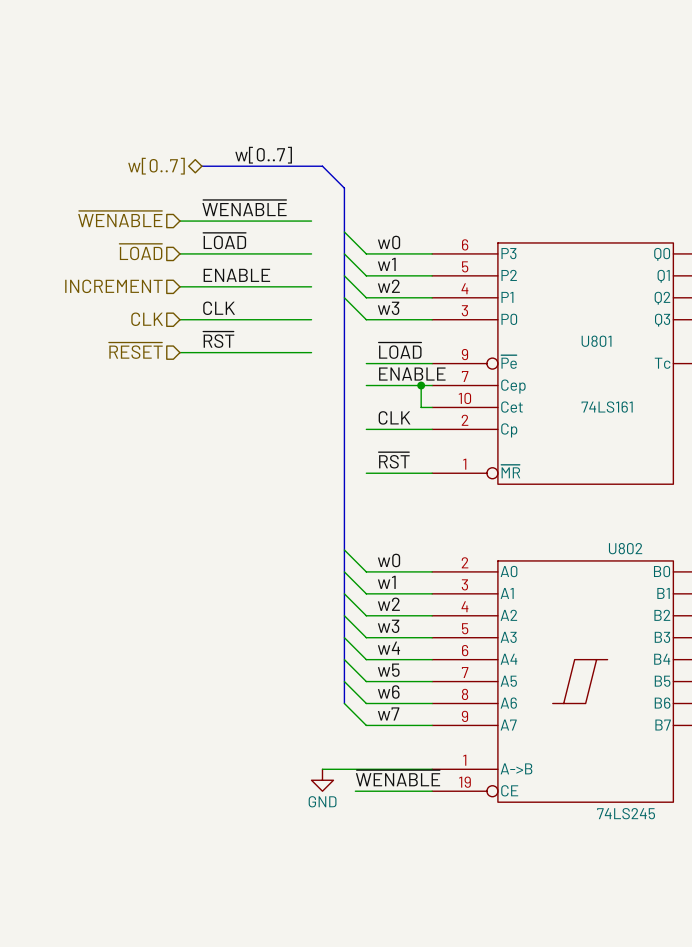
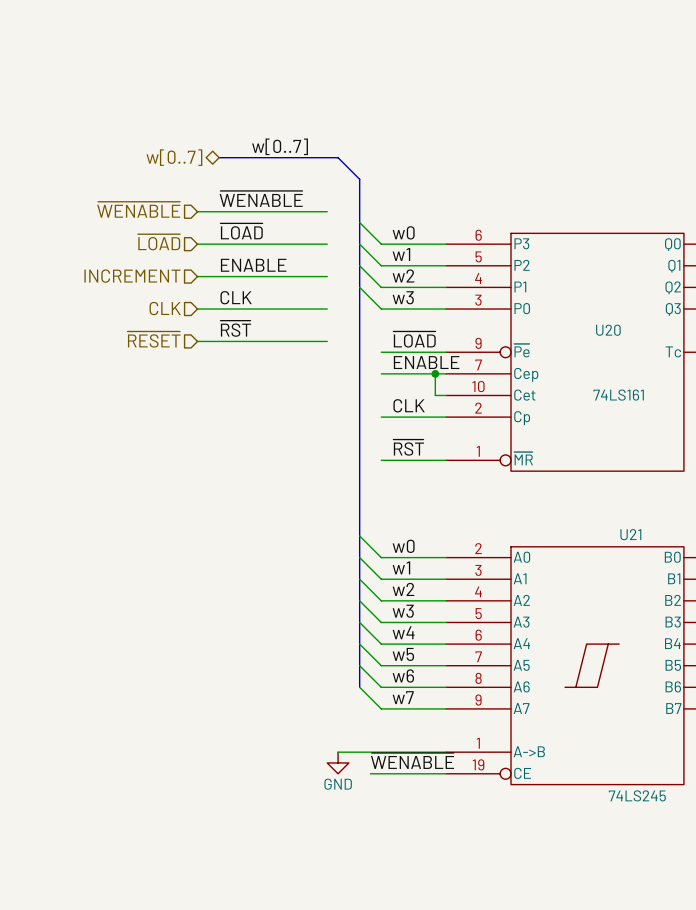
U801 name: U801 (596, 341) -> U20 (608, 330)
U802 name: U802 (625, 548) -> U21 (630, 534)

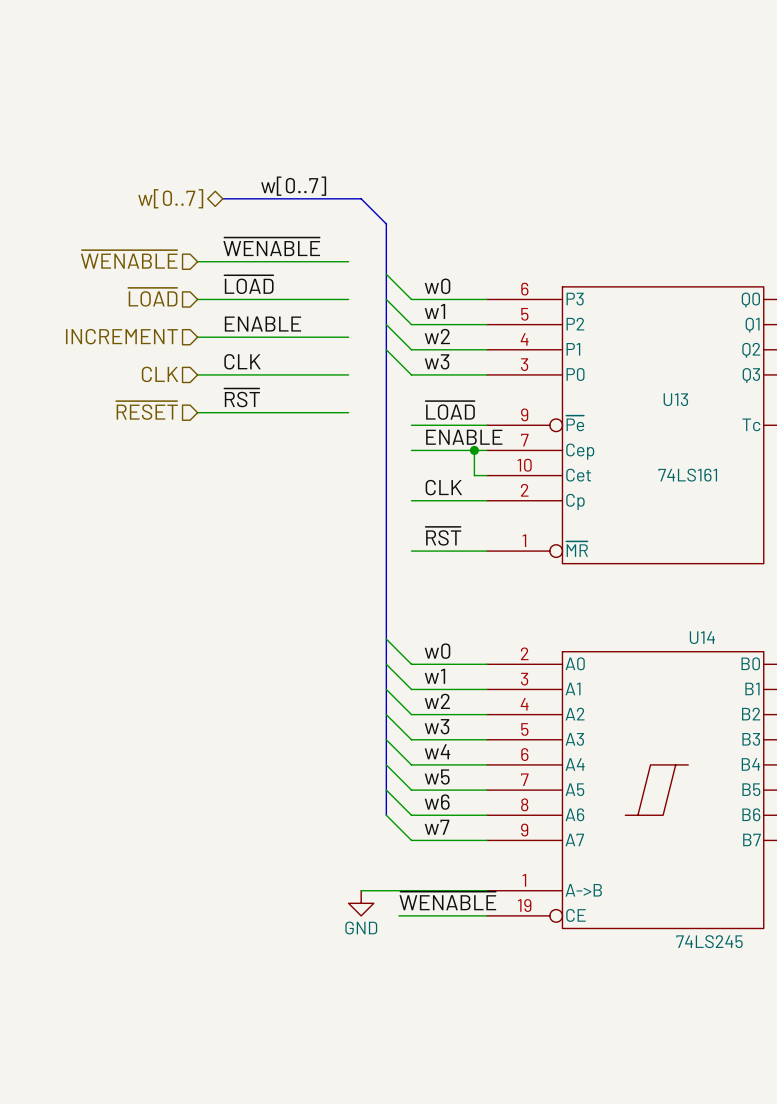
U20 name: U20 (608, 330) -> U13 (675, 399)
U21 name: U21 (630, 534) -> U14 (702, 637)

